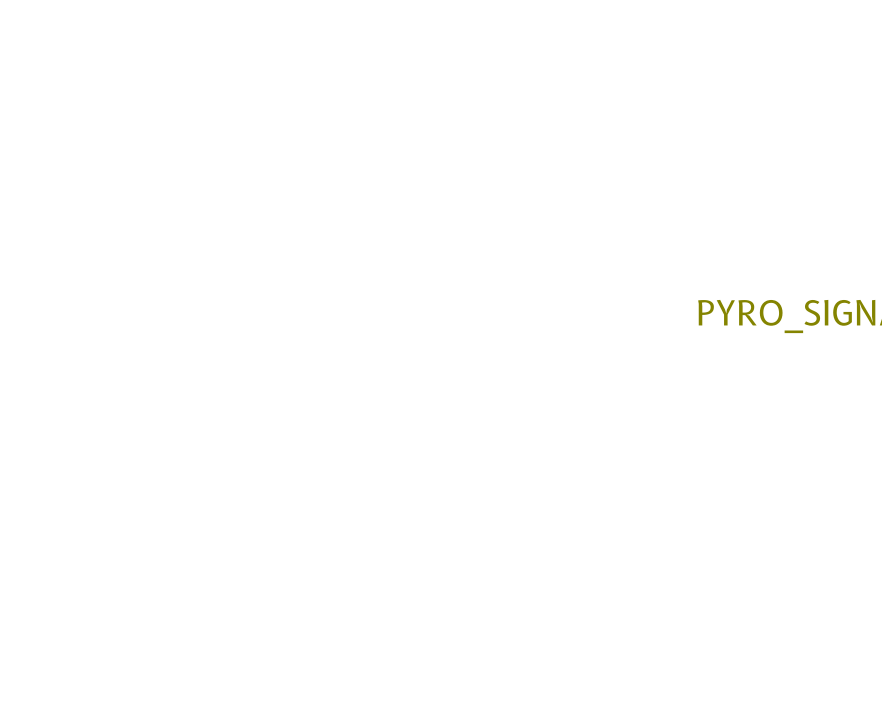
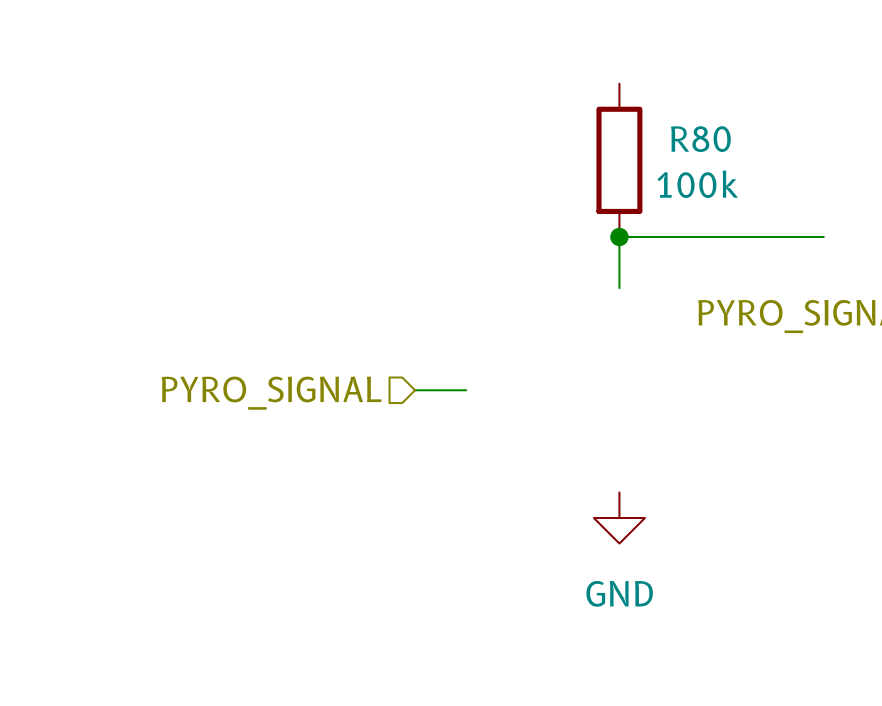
R80: none -> 100k (619, 160)
junction: none -> (619, 236)
wire: none -> (823, 236) (619, 236) (619, 288)
wire: none -> (415, 390) (466, 390)
hierarchical label: none -> PYRO_SIGNAL (271, 393)
power symbol: none -> GND (619, 518)

